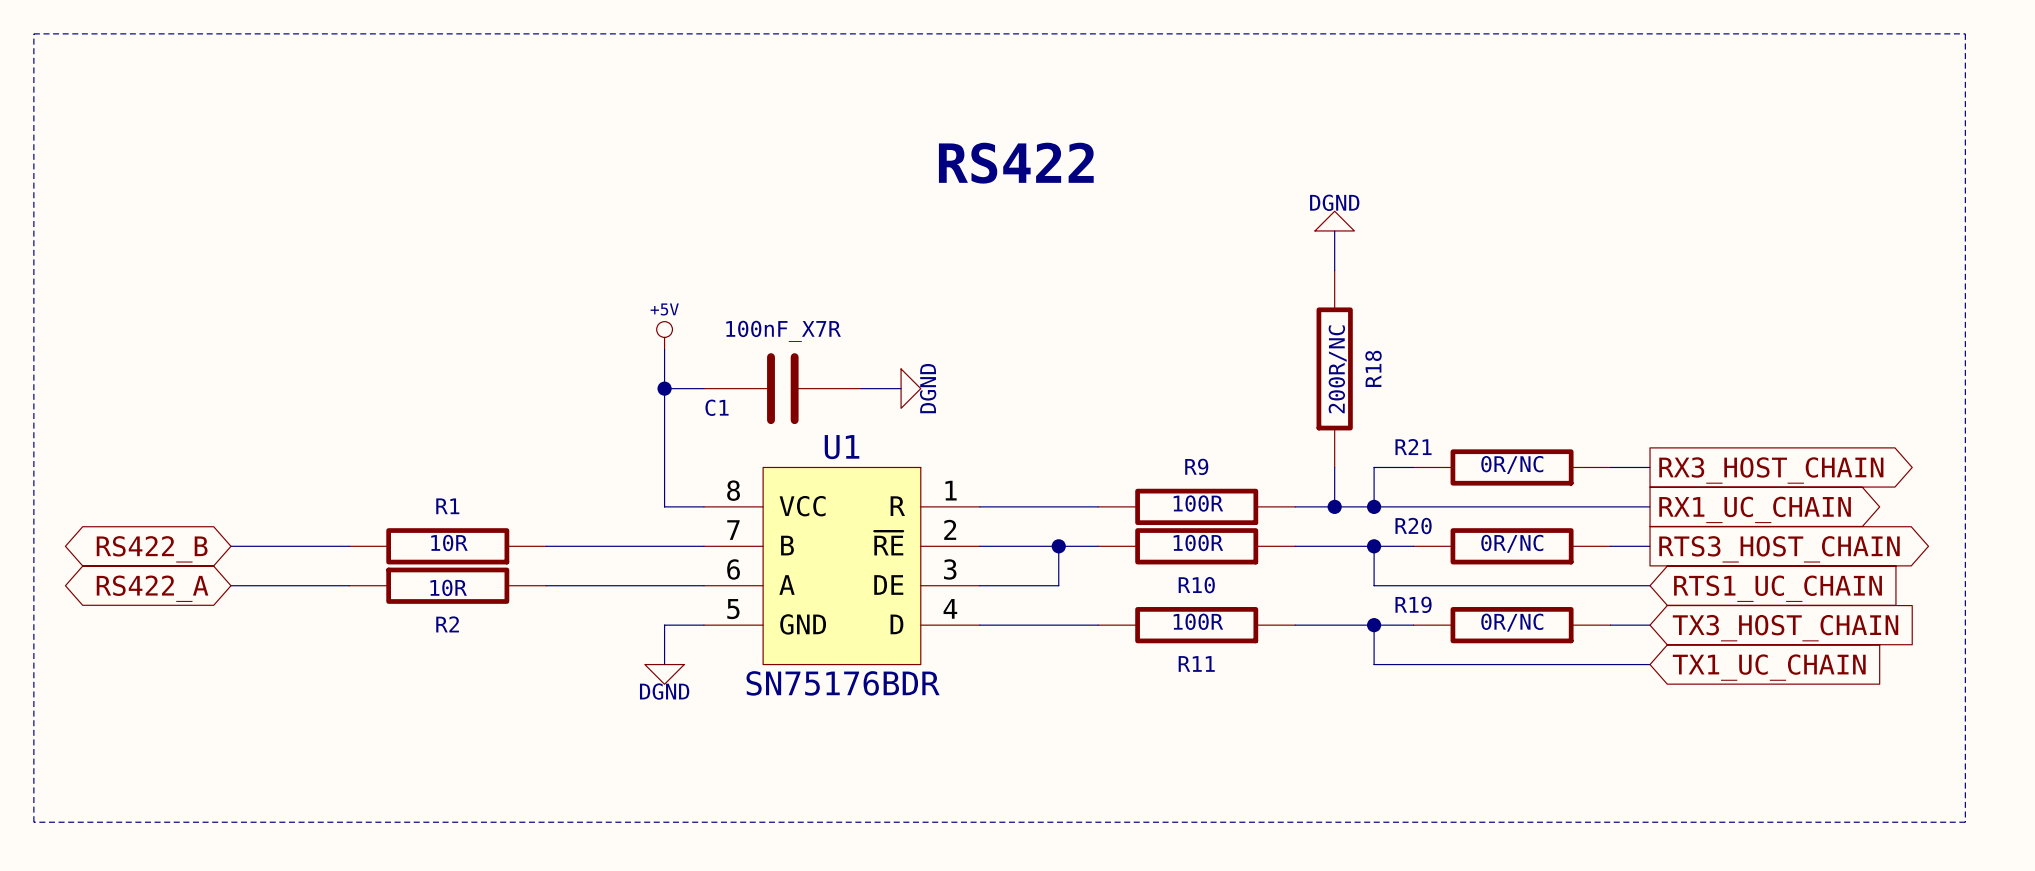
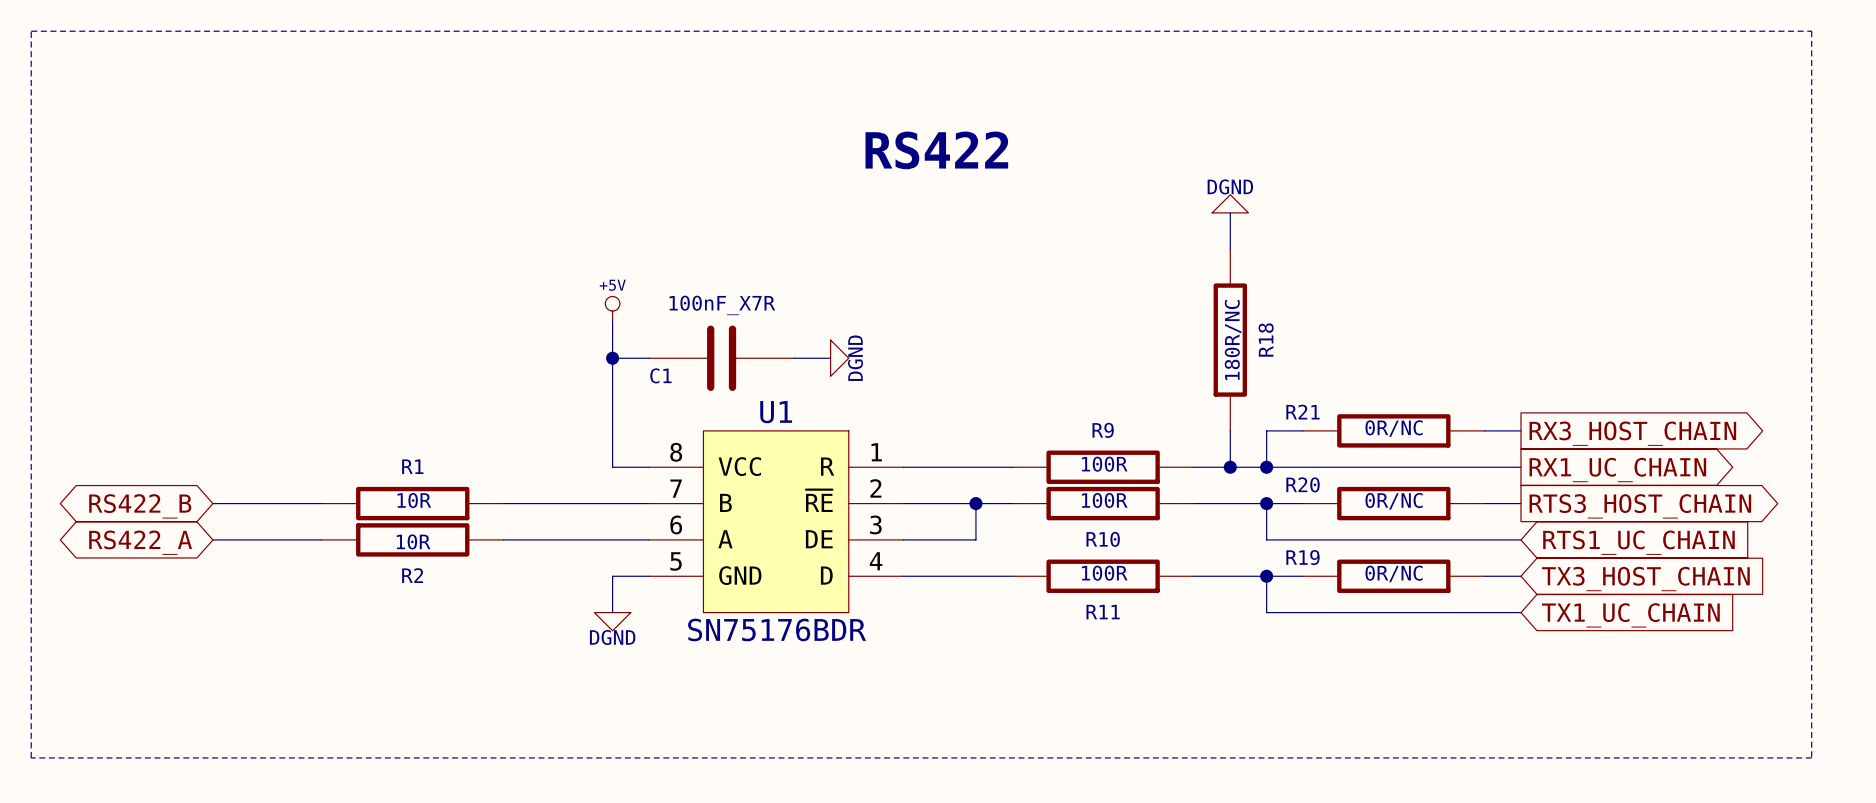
R18 value: 200R/NC (1337, 369) -> 180R/NC (1233, 340)

